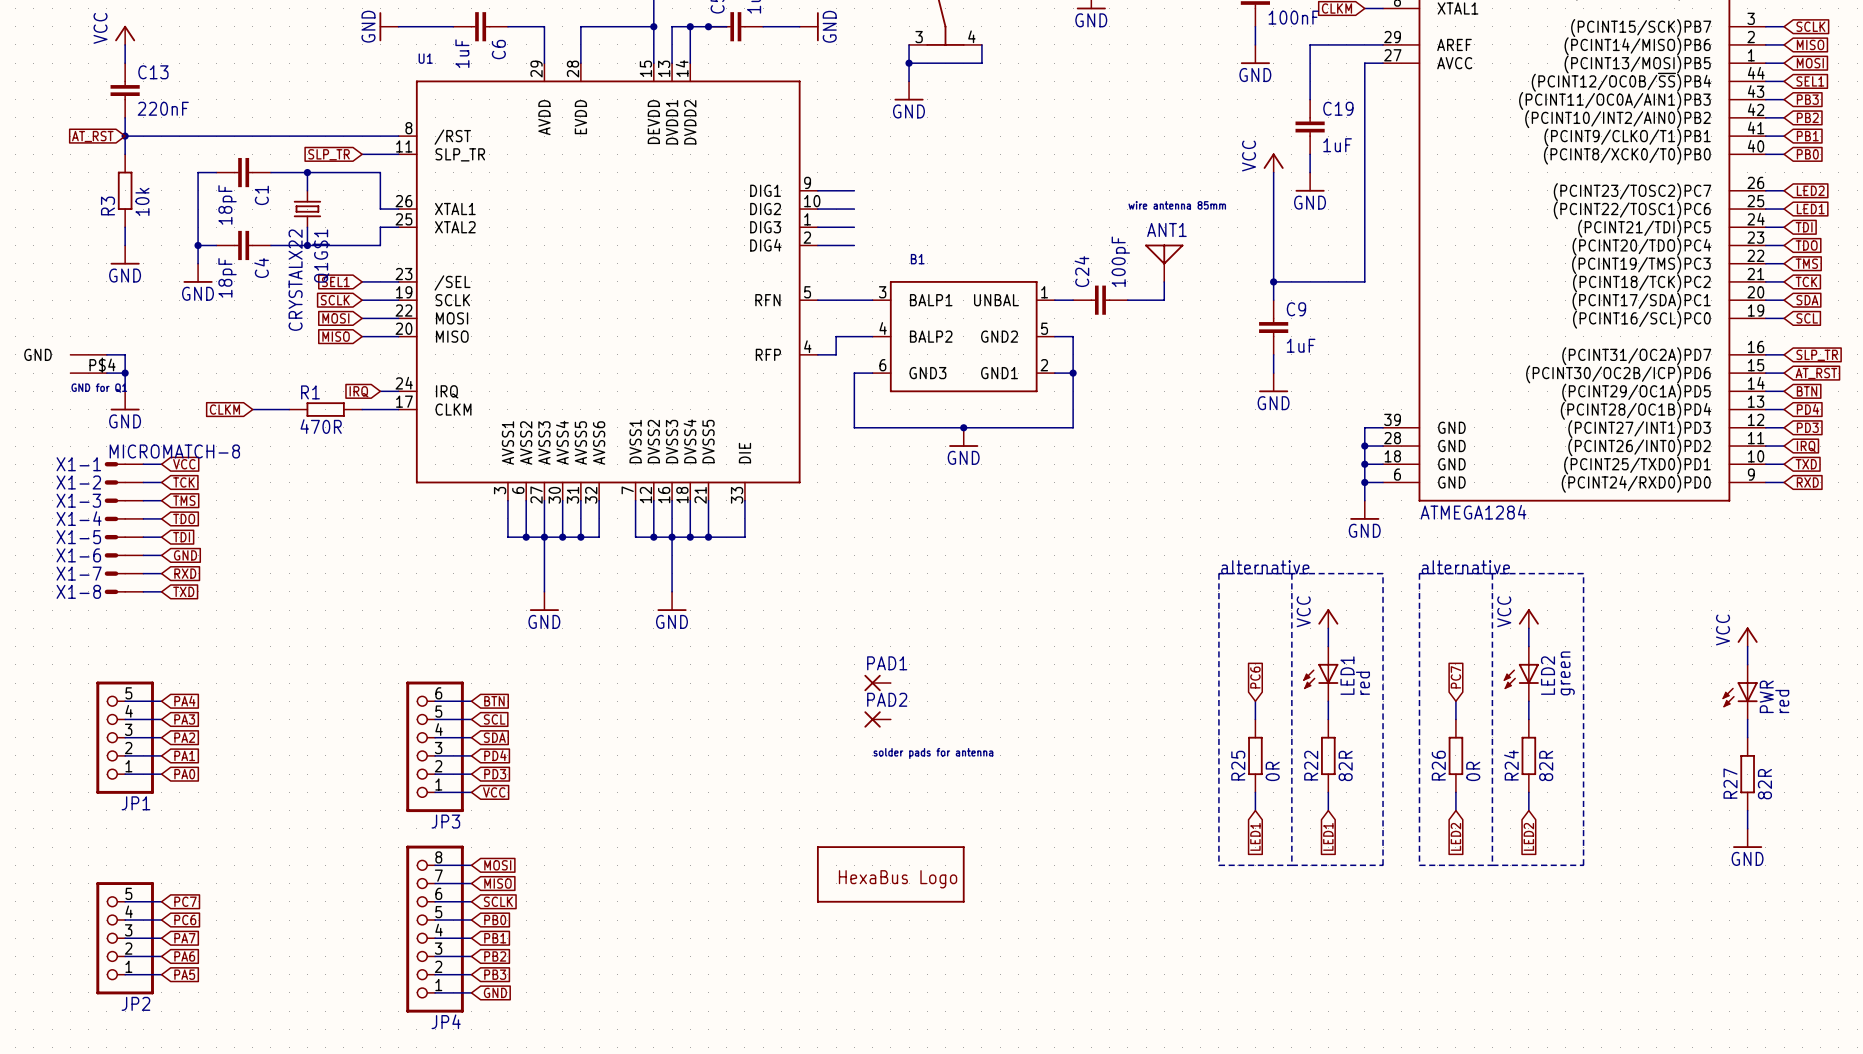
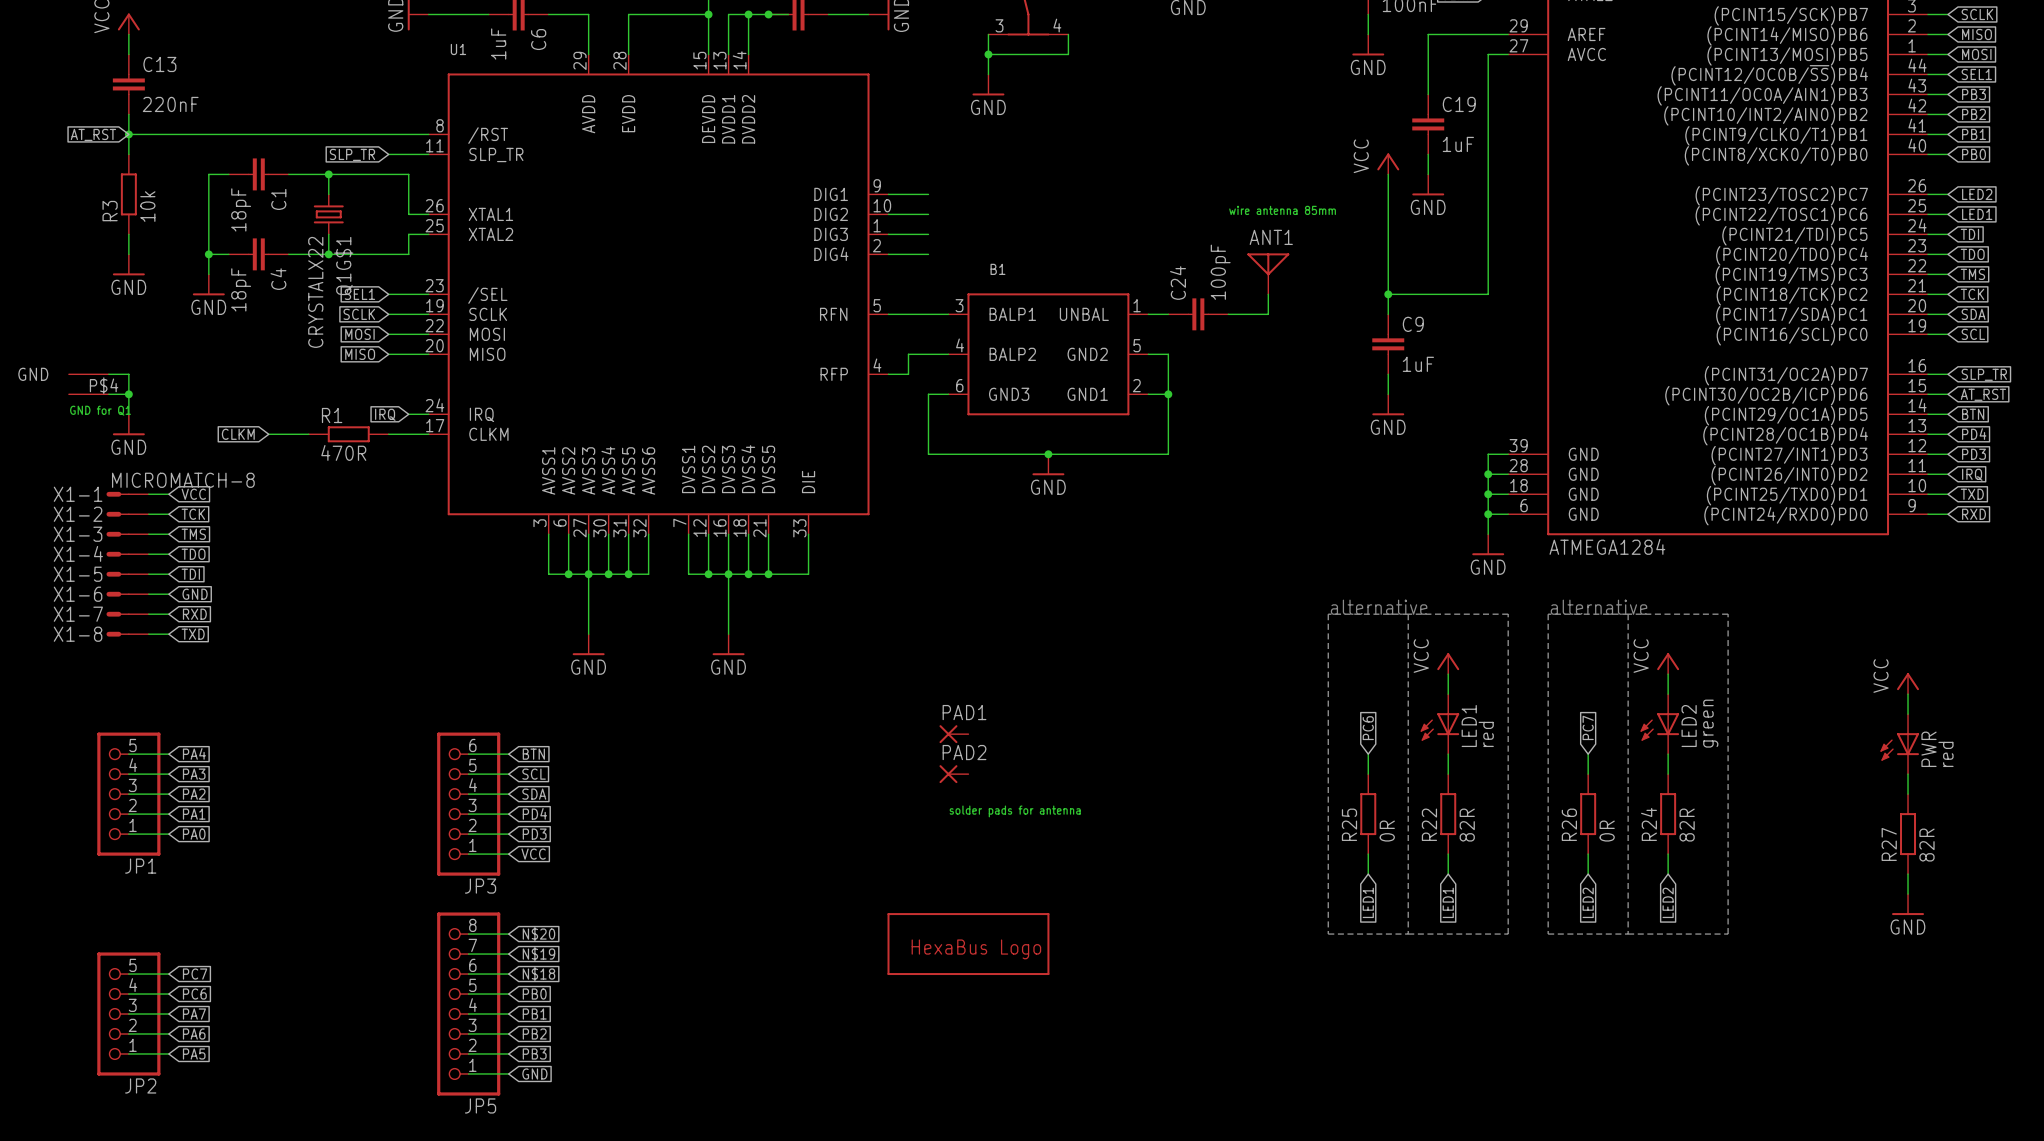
global label: MOSI (497, 865) -> N$20 (538, 934)
global label: MISO (497, 883) -> N$19 (538, 954)
global label: SCLK (498, 901) -> N$18 (538, 974)
JP4 name: JP4 (446, 1021) -> JP5 (480, 1105)

